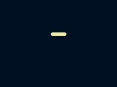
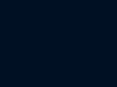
line: (52, 34) (64, 34) -> none

